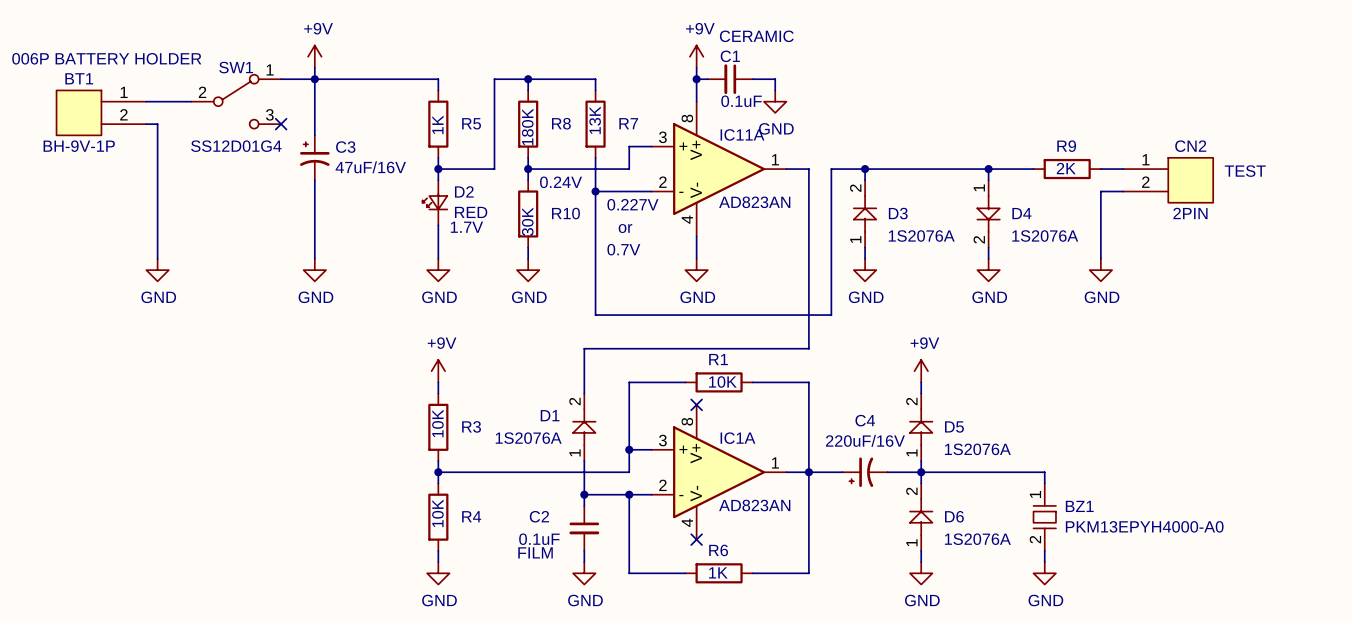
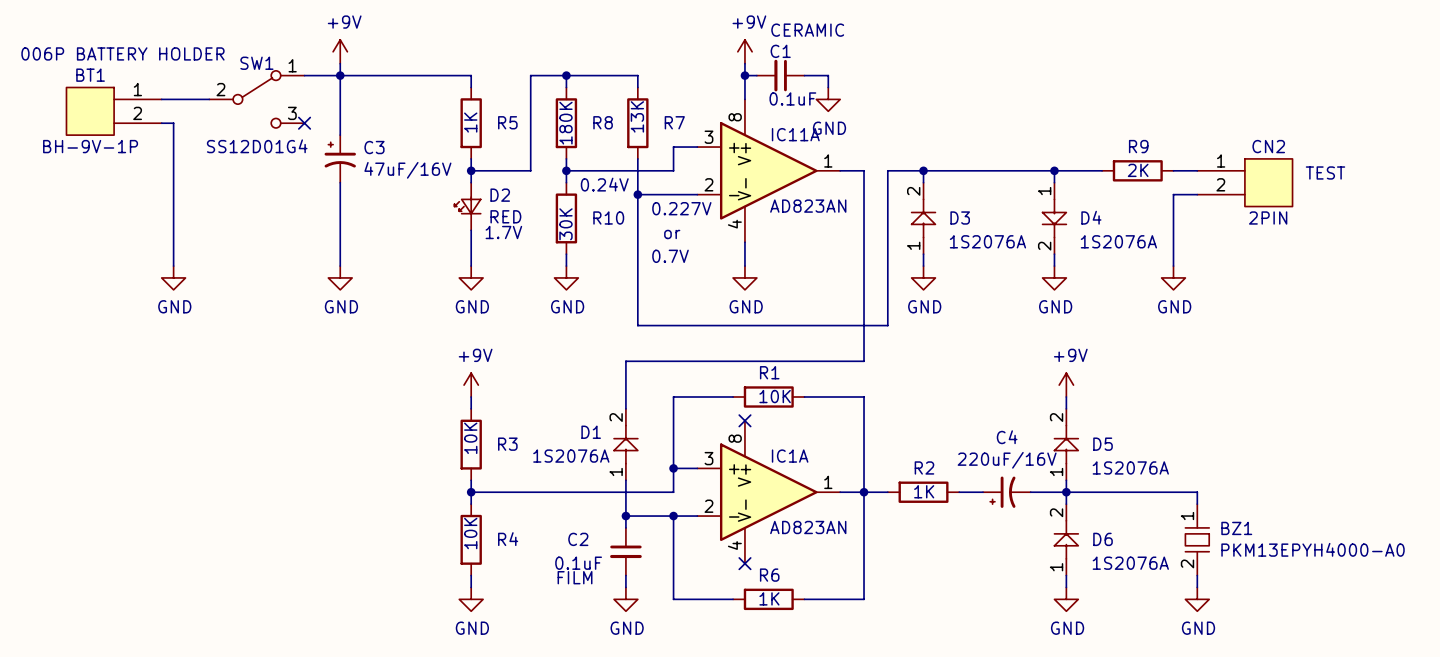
power symbol position: +9V (921, 371) -> +9V (1066, 385)
wire: (921, 382) (921, 393) -> (1066, 396) (1066, 408)
D5 position: (921, 427) -> (1066, 444)
wire: (921, 461) (921, 483) -> (1066, 480) (1066, 504)
C4 position: (865, 472) -> (1006, 492)
R2: none -> 1K (923, 492)
junction: (921, 472) -> none
junction: none -> (1066, 492)
wire: (1044, 472) (1044, 483) -> (1113, 492) (1197, 492) (1197, 504)
D6 position: (921, 517) -> (1066, 539)
BZ1 position: (1044, 517) -> (1197, 539)
wire: (921, 550) (921, 562) -> (1066, 575) (1066, 587)
wire: (1044, 550) (1044, 562) -> (1197, 575) (1197, 587)
power symbol: GND (921, 573) -> none
power symbol: none -> GND (1066, 599)
power symbol: GND (1044, 573) -> none
power symbol: none -> GND (1197, 599)

